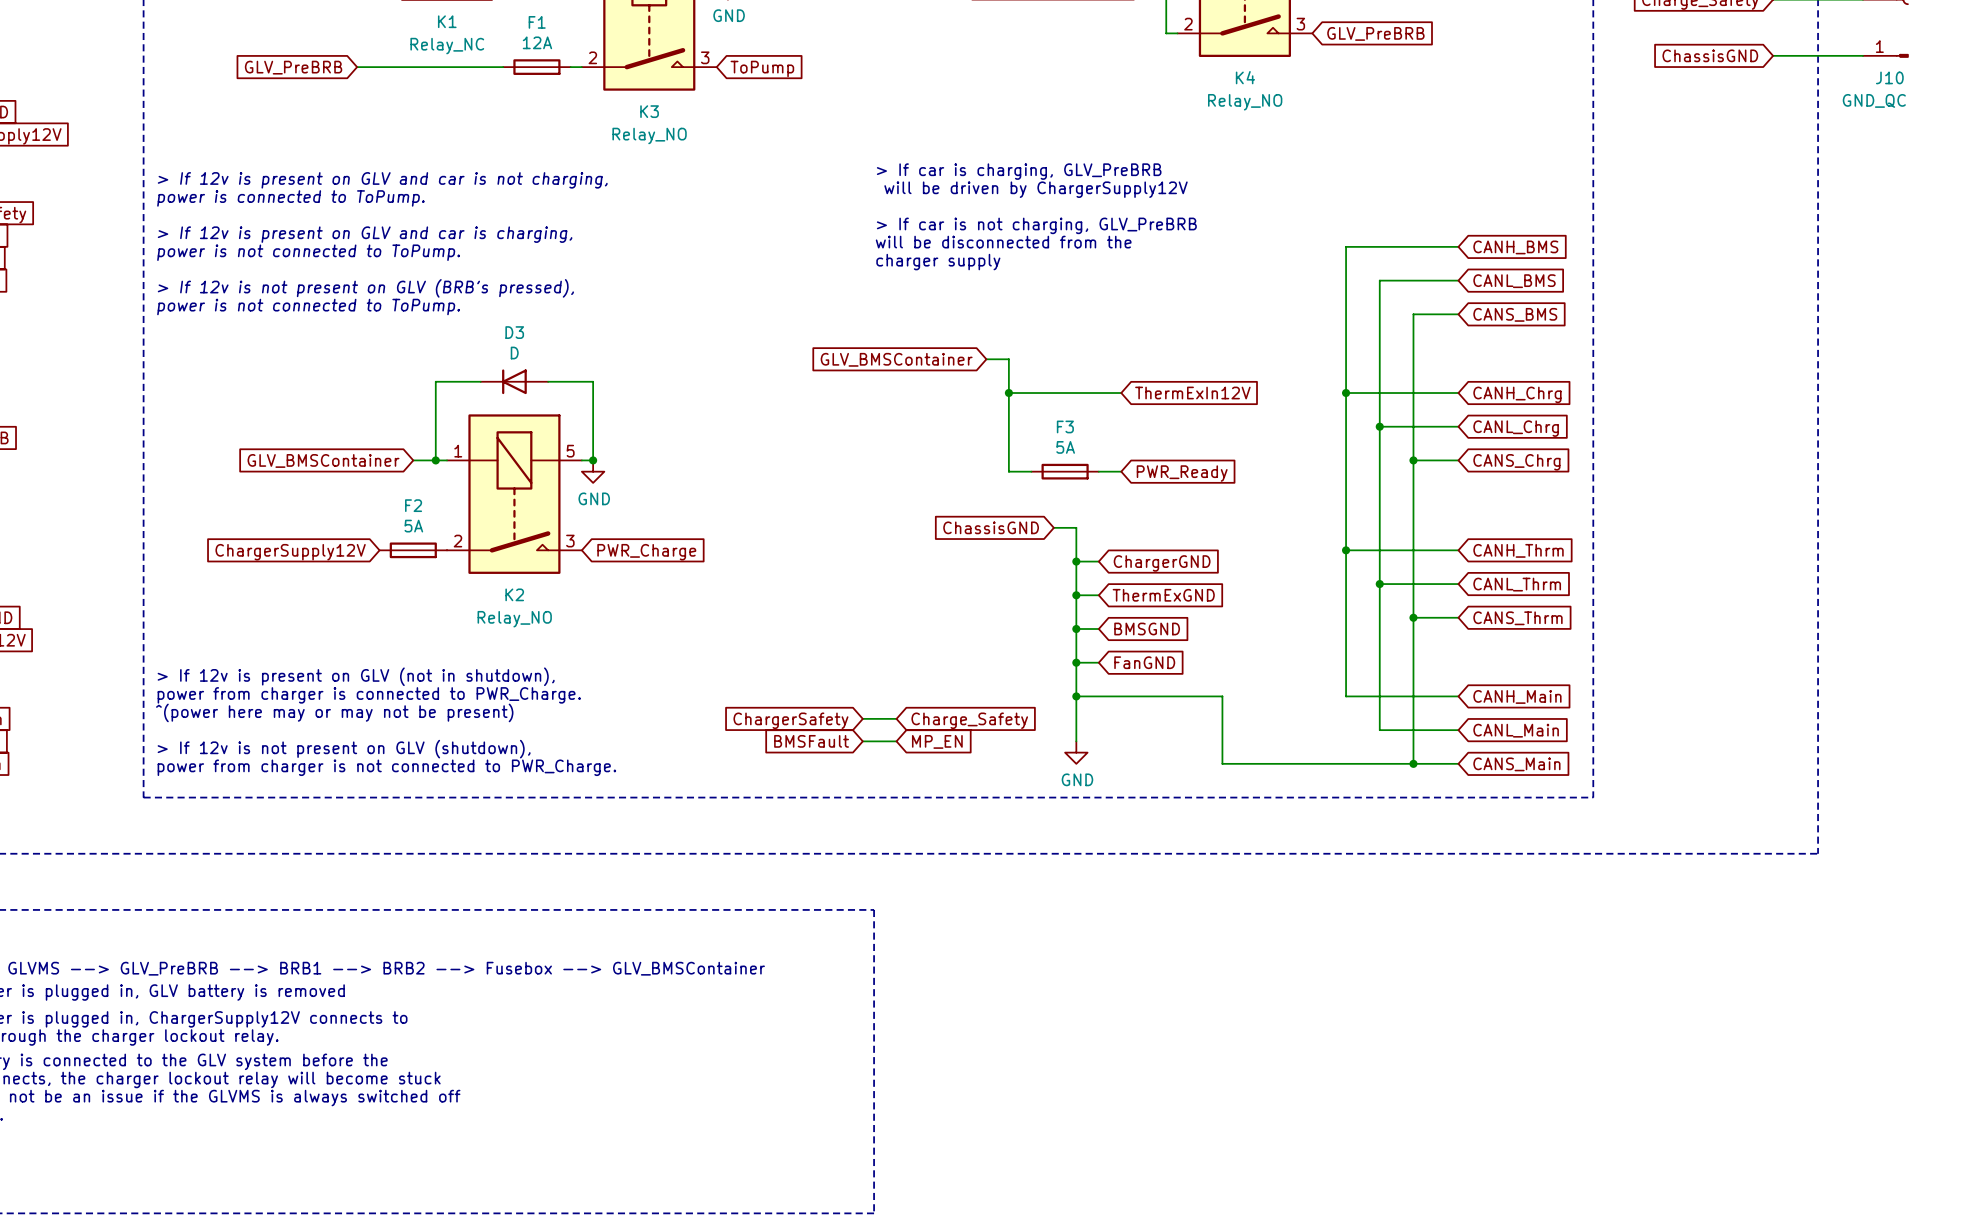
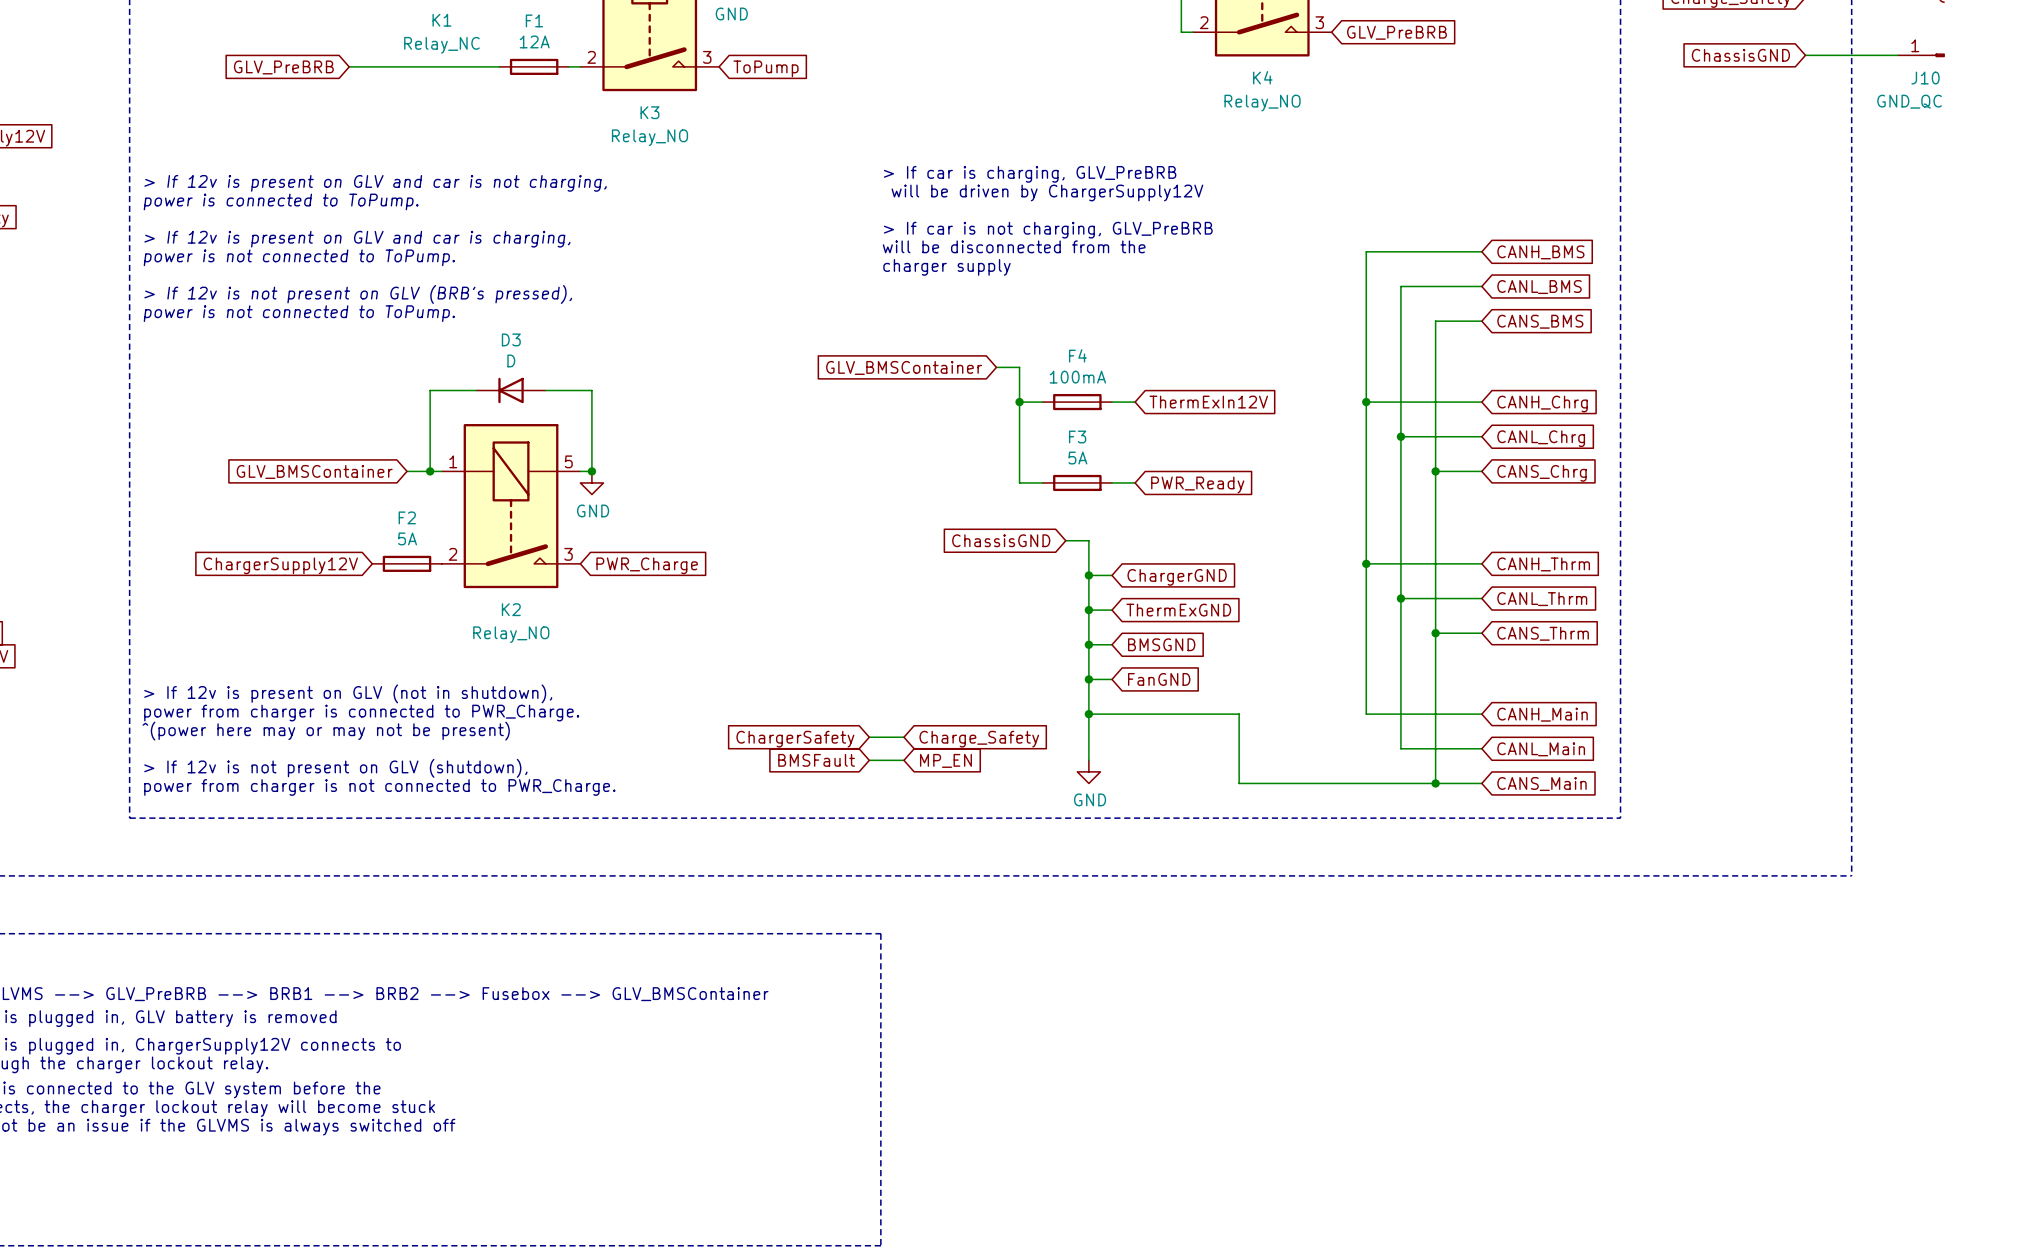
F4: none -> 100mA (1077, 402)

